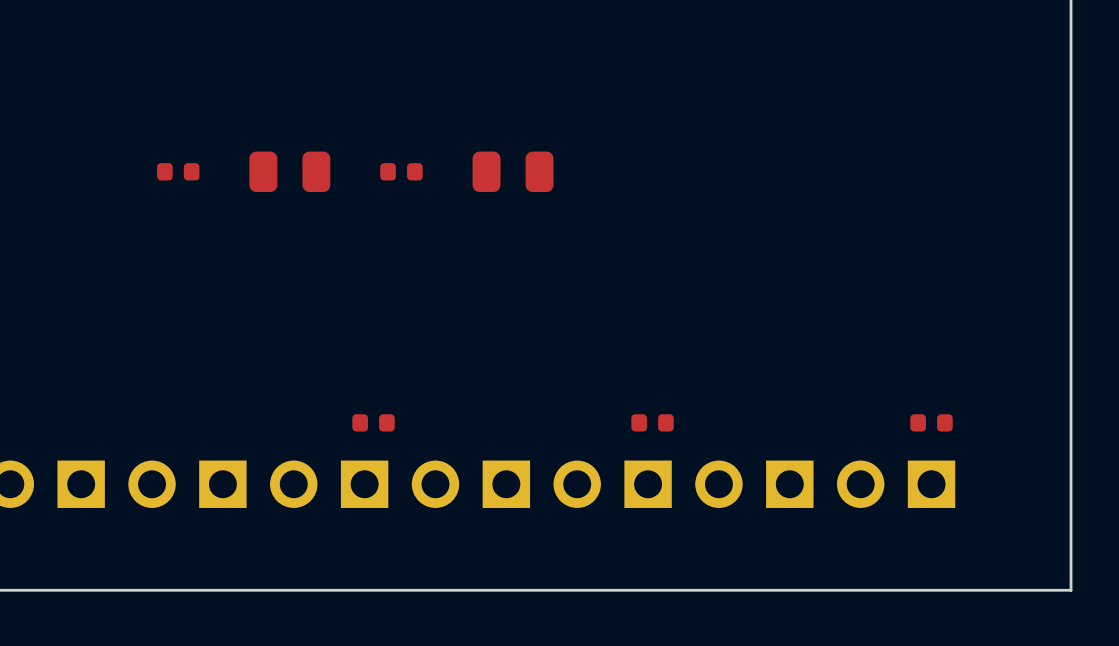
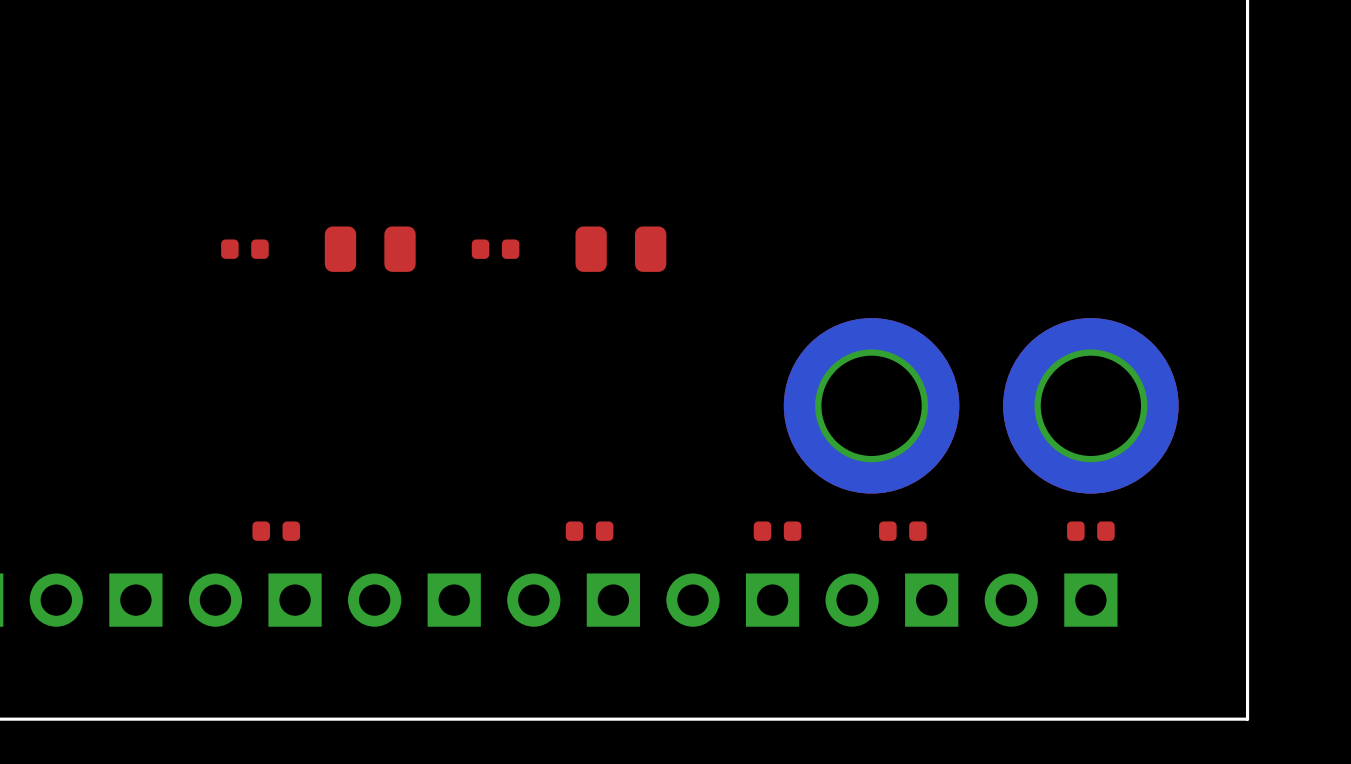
part: none -> (871, 405)
part: none -> (1090, 405)
part: none -> (276, 531)
part: (373, 422) -> none
part: none -> (589, 531)
part: none -> (902, 531)

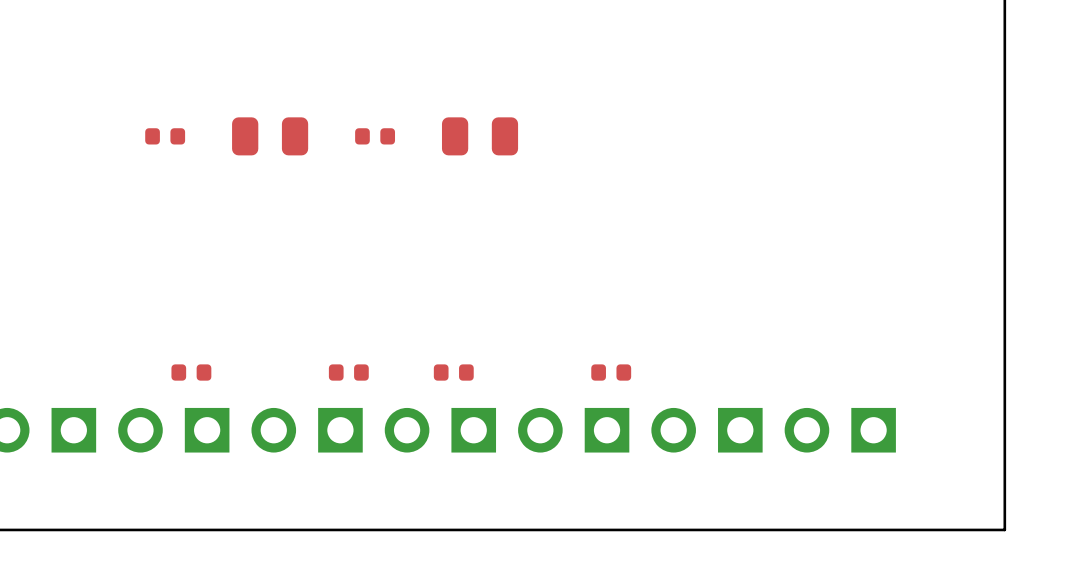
part: (871, 405) -> none
part: (1090, 405) -> none
part: none -> (348, 372)
part: (902, 531) -> none
part: (1090, 531) -> none

